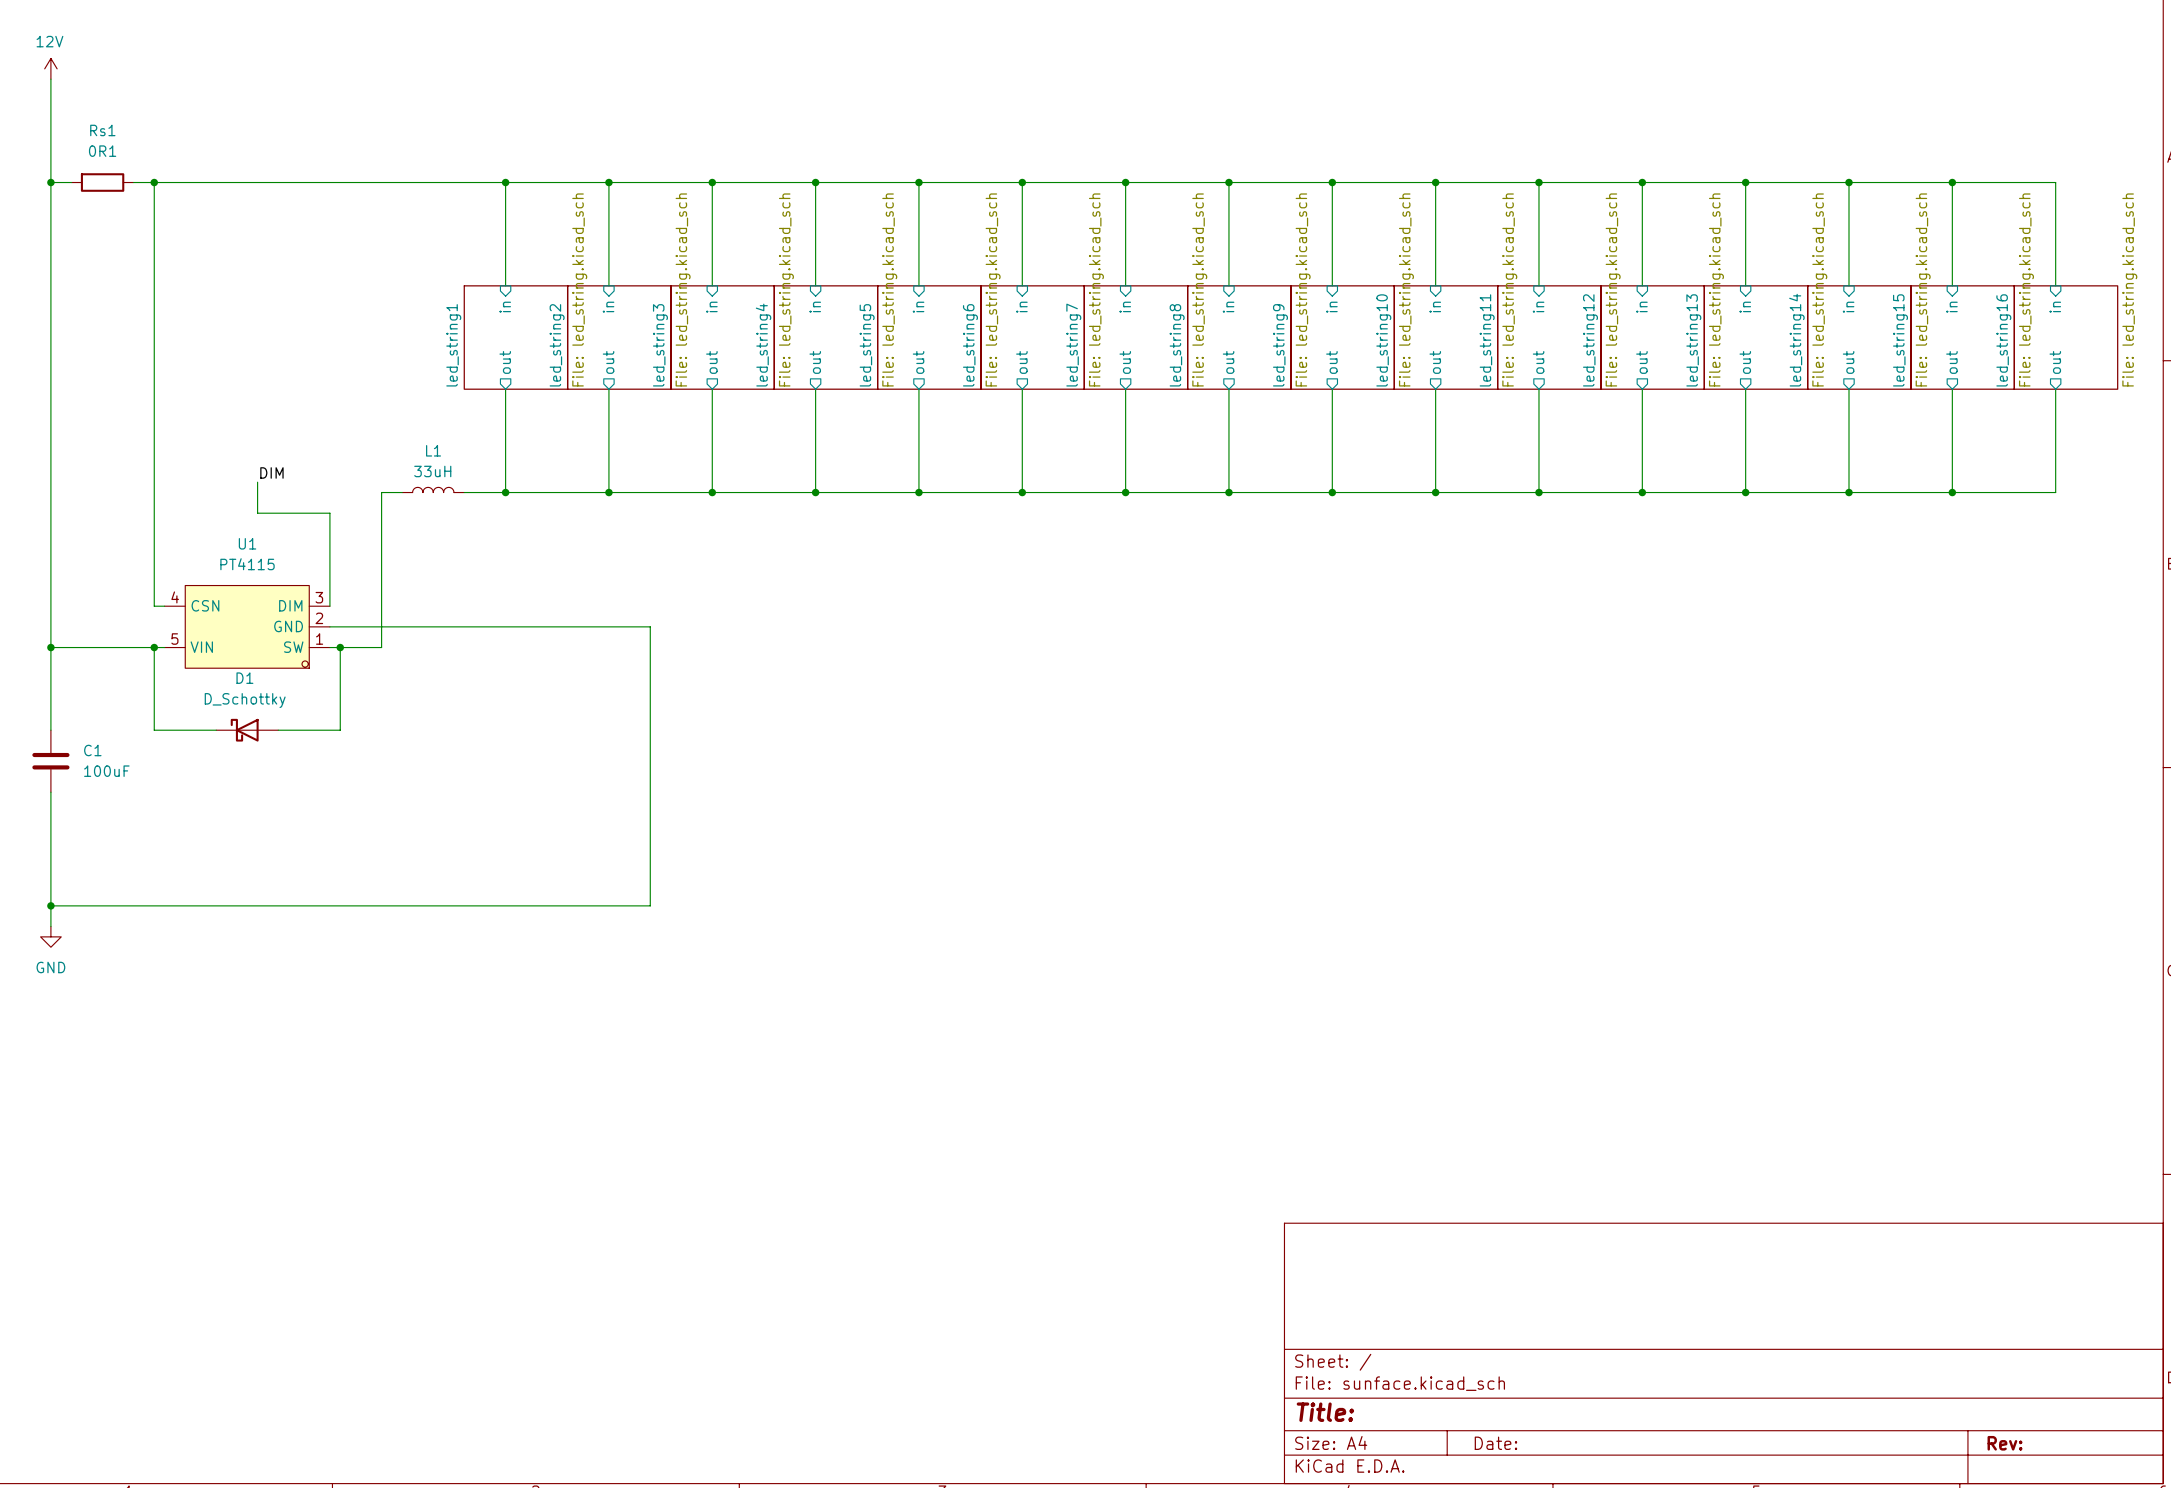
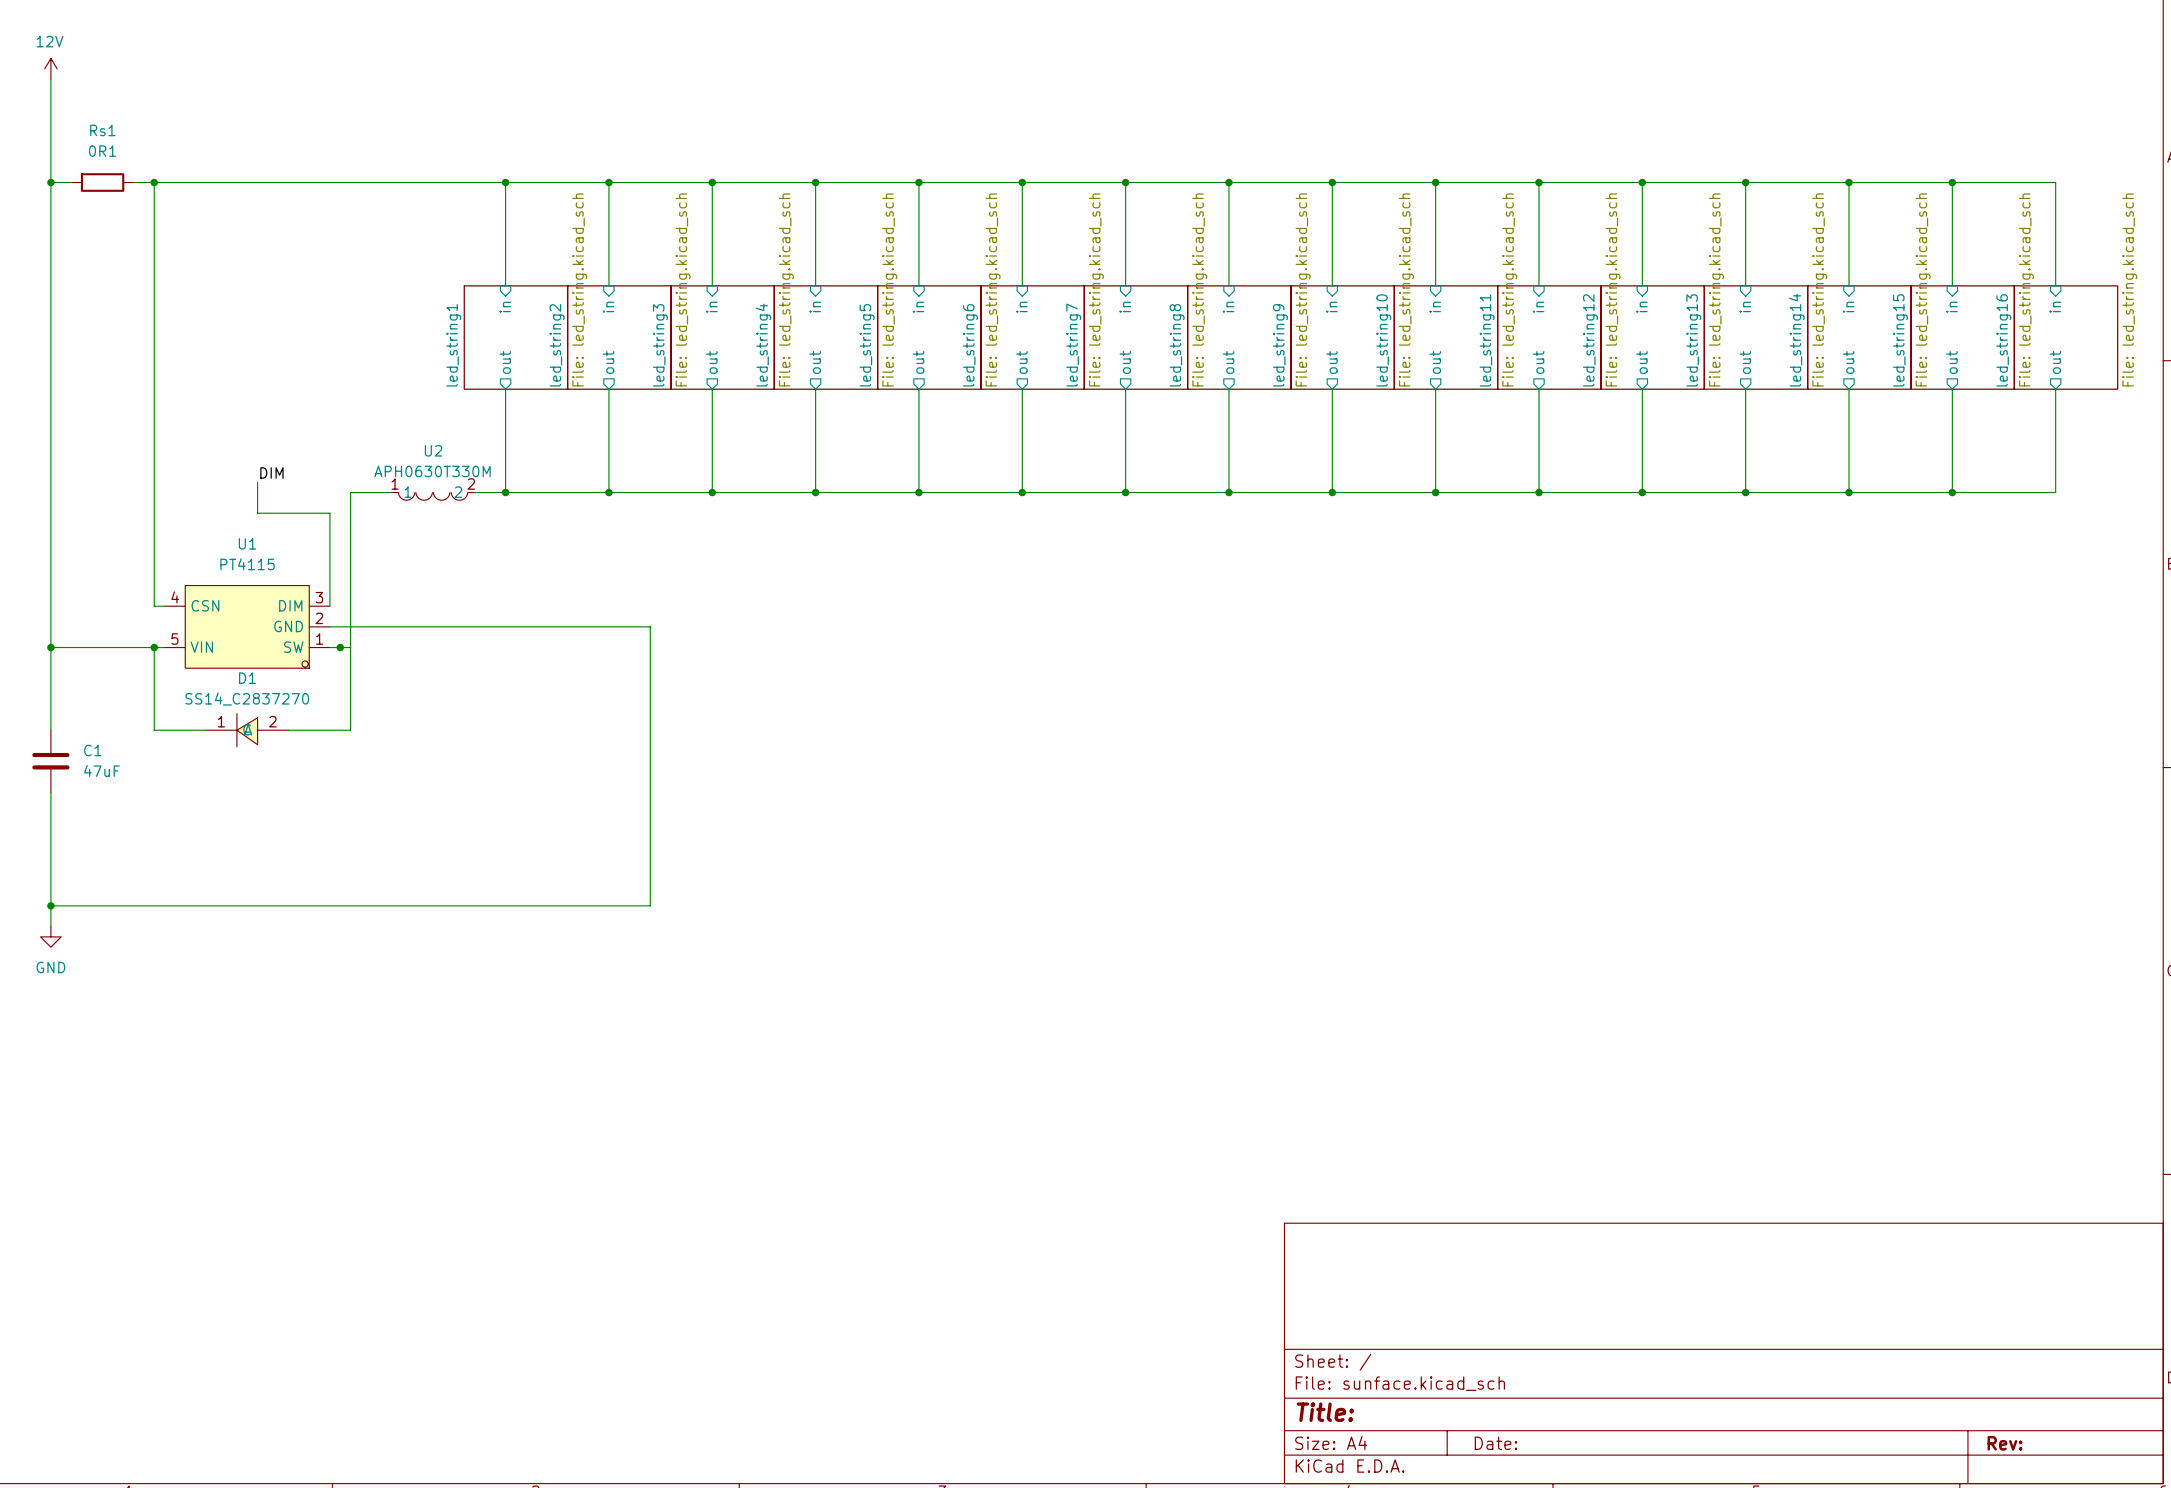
L1: 33uH (433, 489) -> none
wire: (381, 492) (381, 647) (350, 647) -> (381, 492) (350, 492) (350, 730) (340, 730)
U2: none -> APH0630T330M (433, 496)
wire: (340, 647) (340, 730) -> none
D1 value: D_Schottky (245, 700) -> SS14_C2837270 (247, 699)
D1 symbol: [216, 718, 279, 742] -> [205, 713, 289, 747]
C1 value: 100uF (106, 771) -> 47uF (101, 770)

